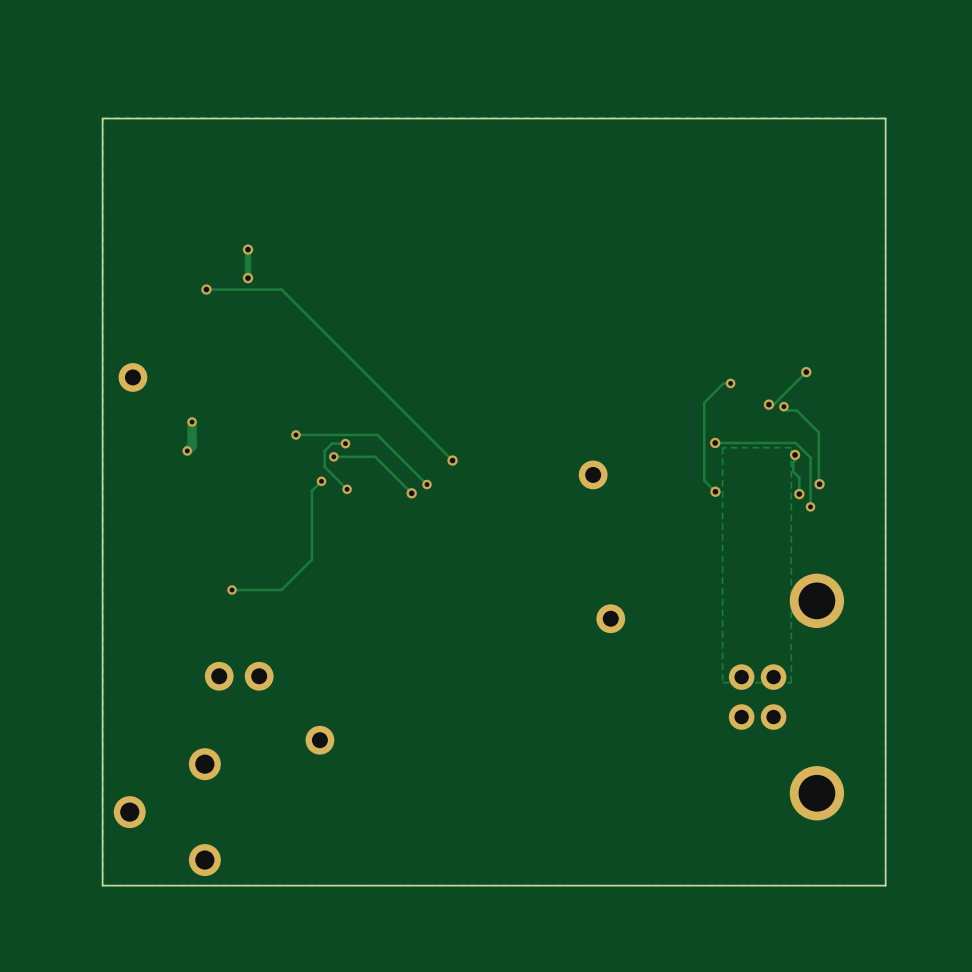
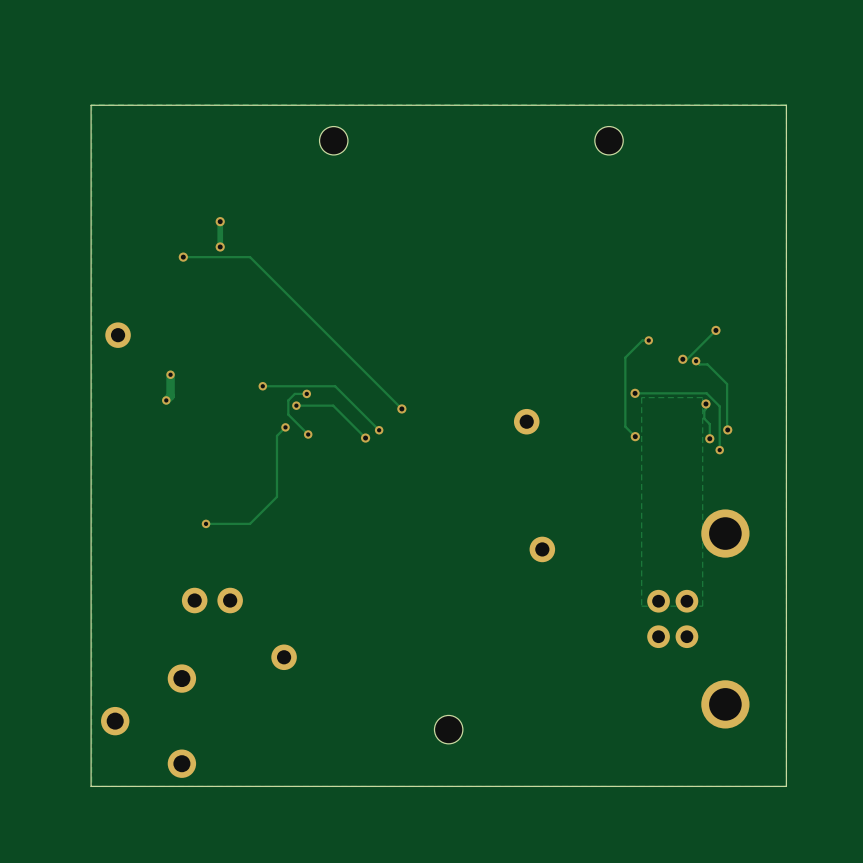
hole: none -> (333, 140)
hole: none -> (609, 140)
hole: none -> (448, 729)

